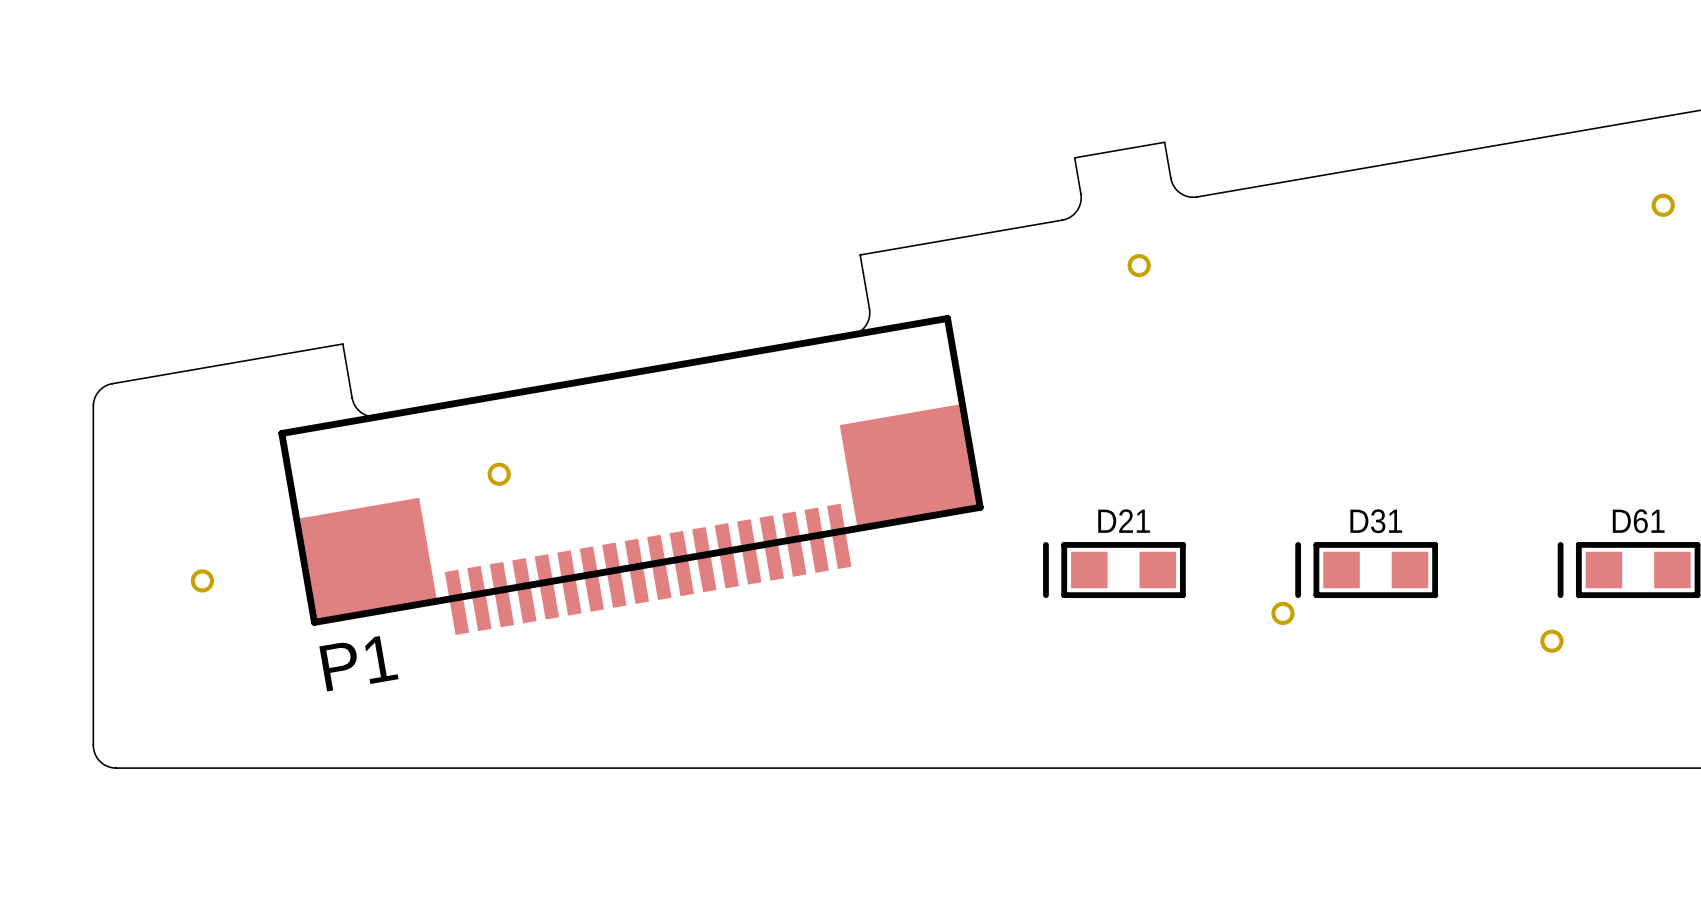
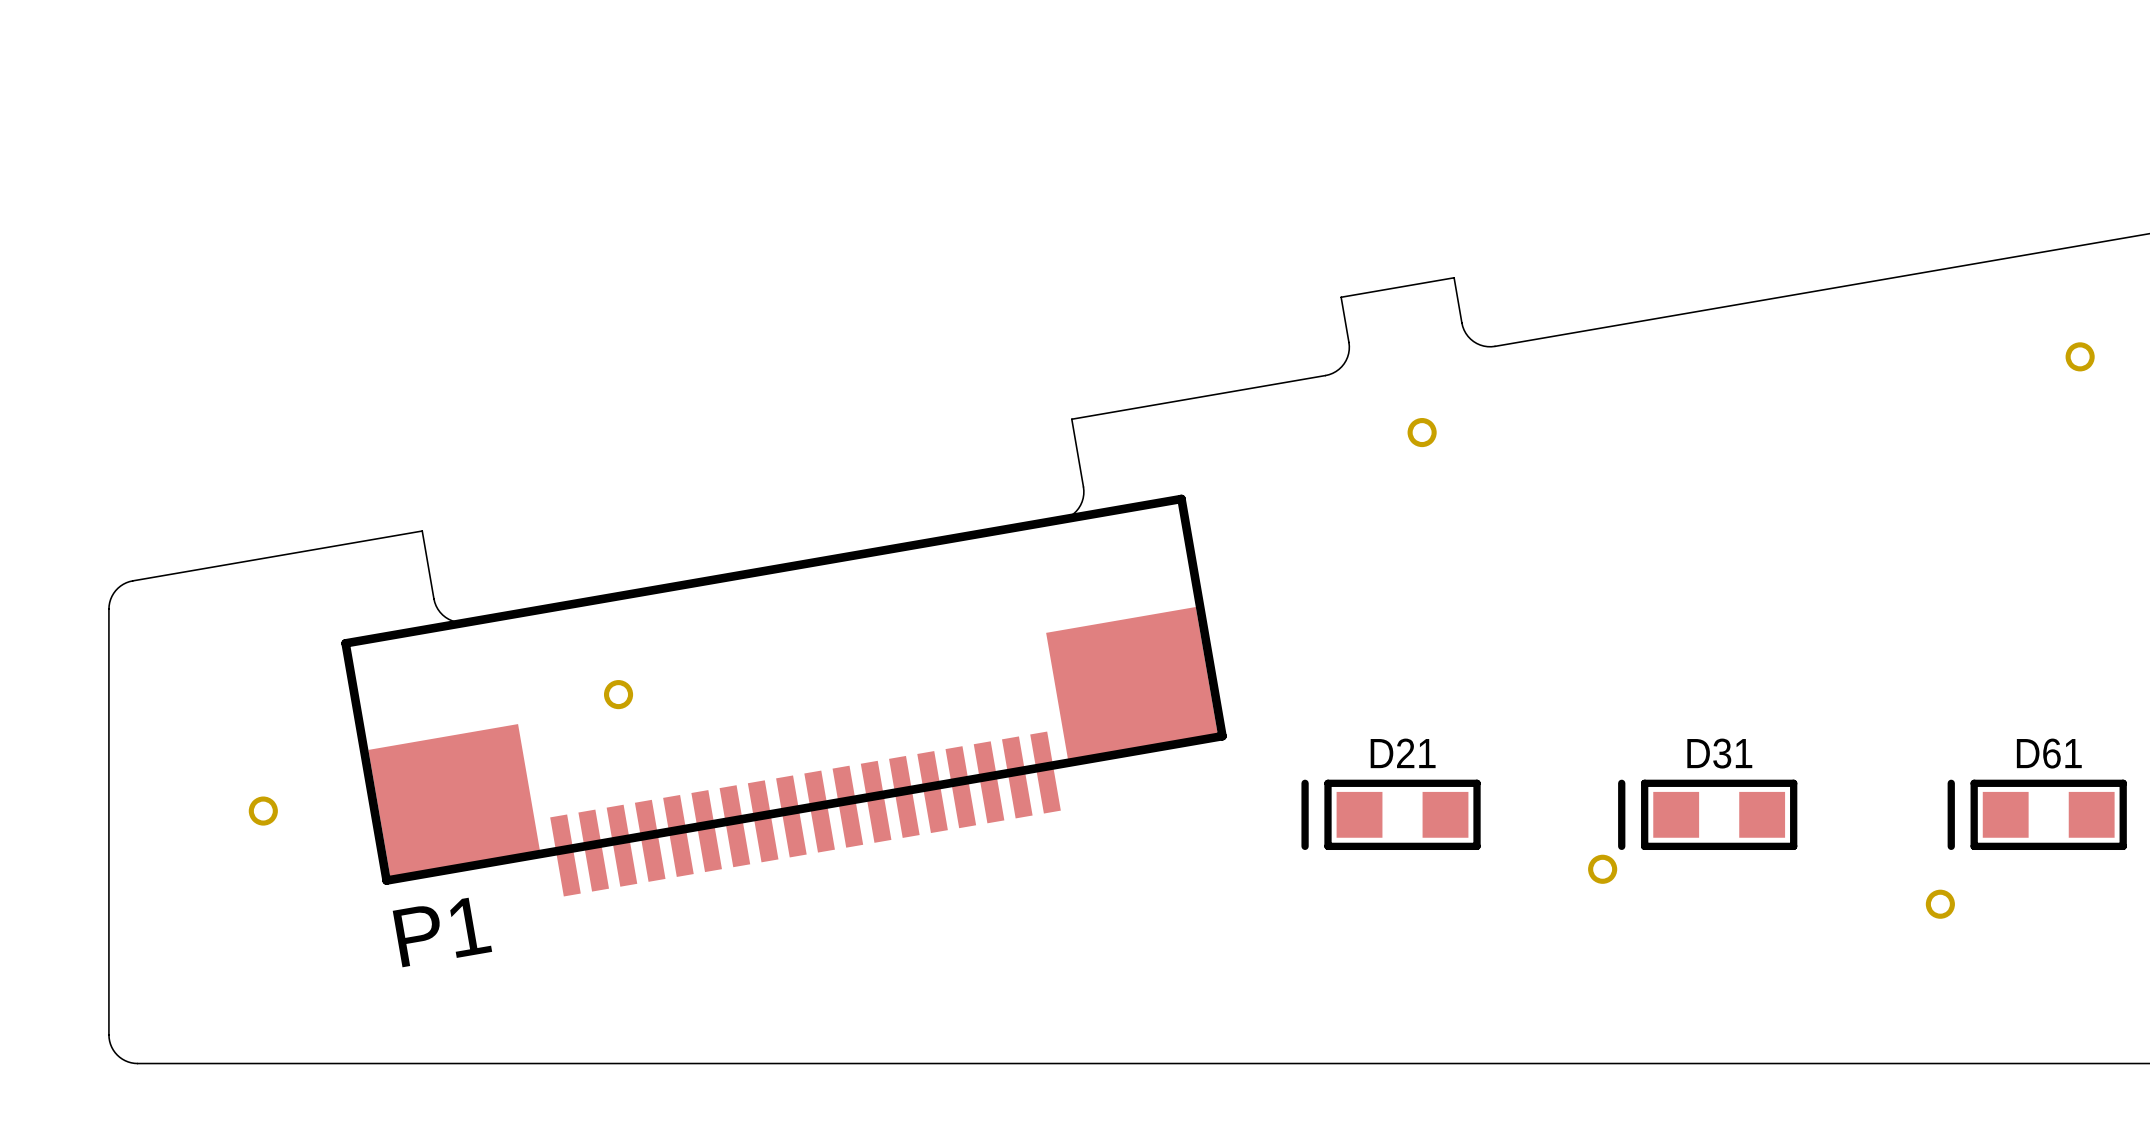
part position: (202, 580) -> (263, 811)

